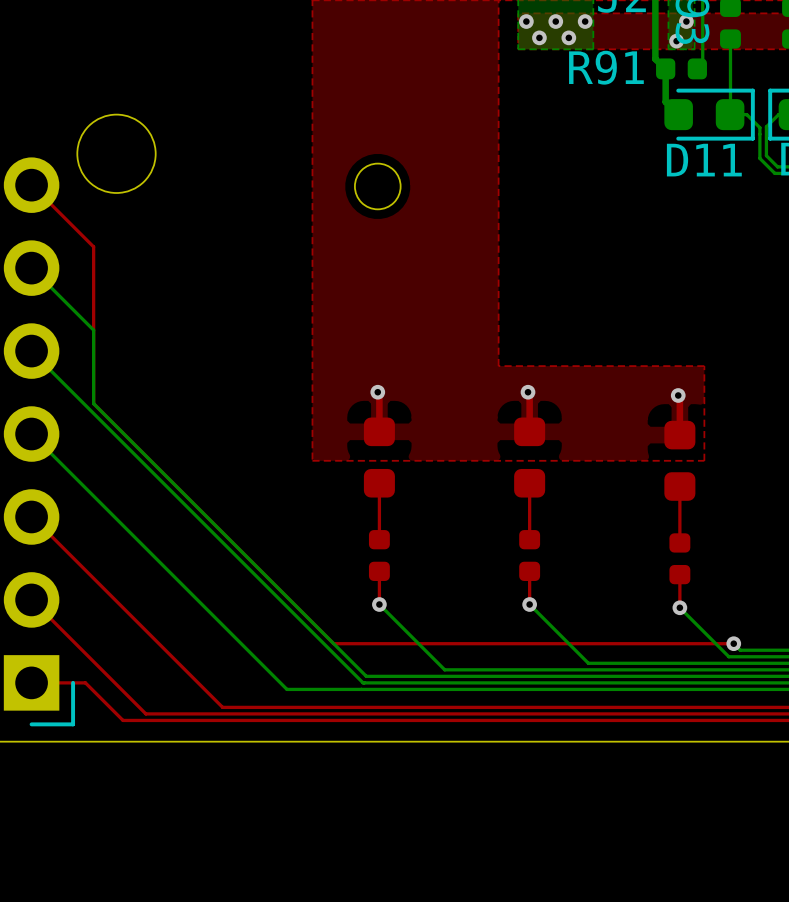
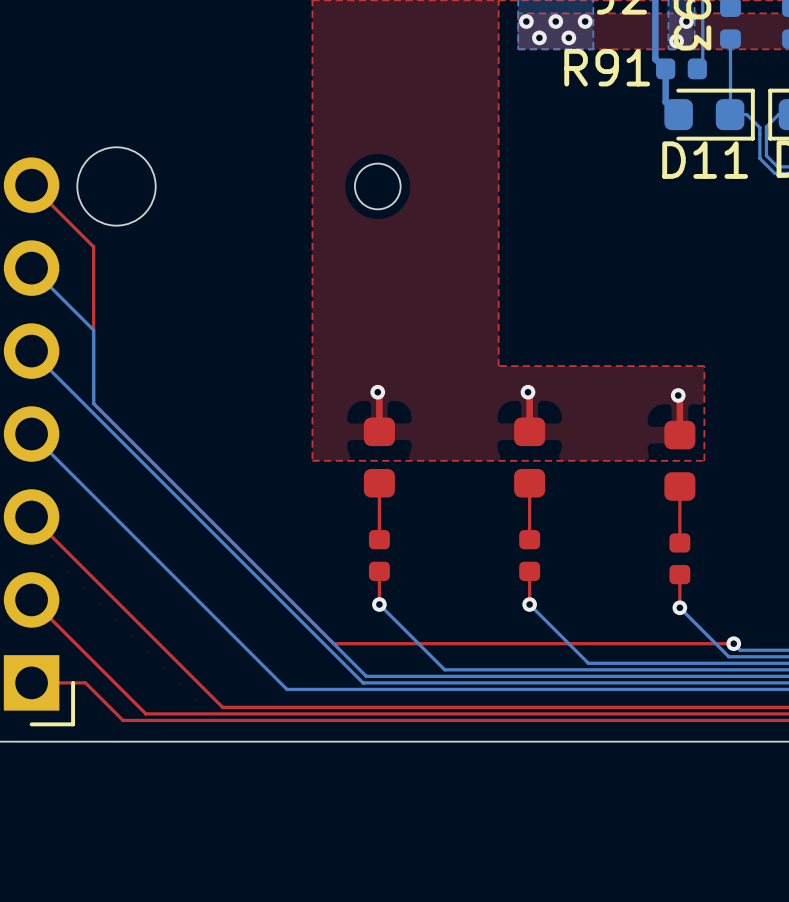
round board edge position: (116, 153) -> (116, 186)

